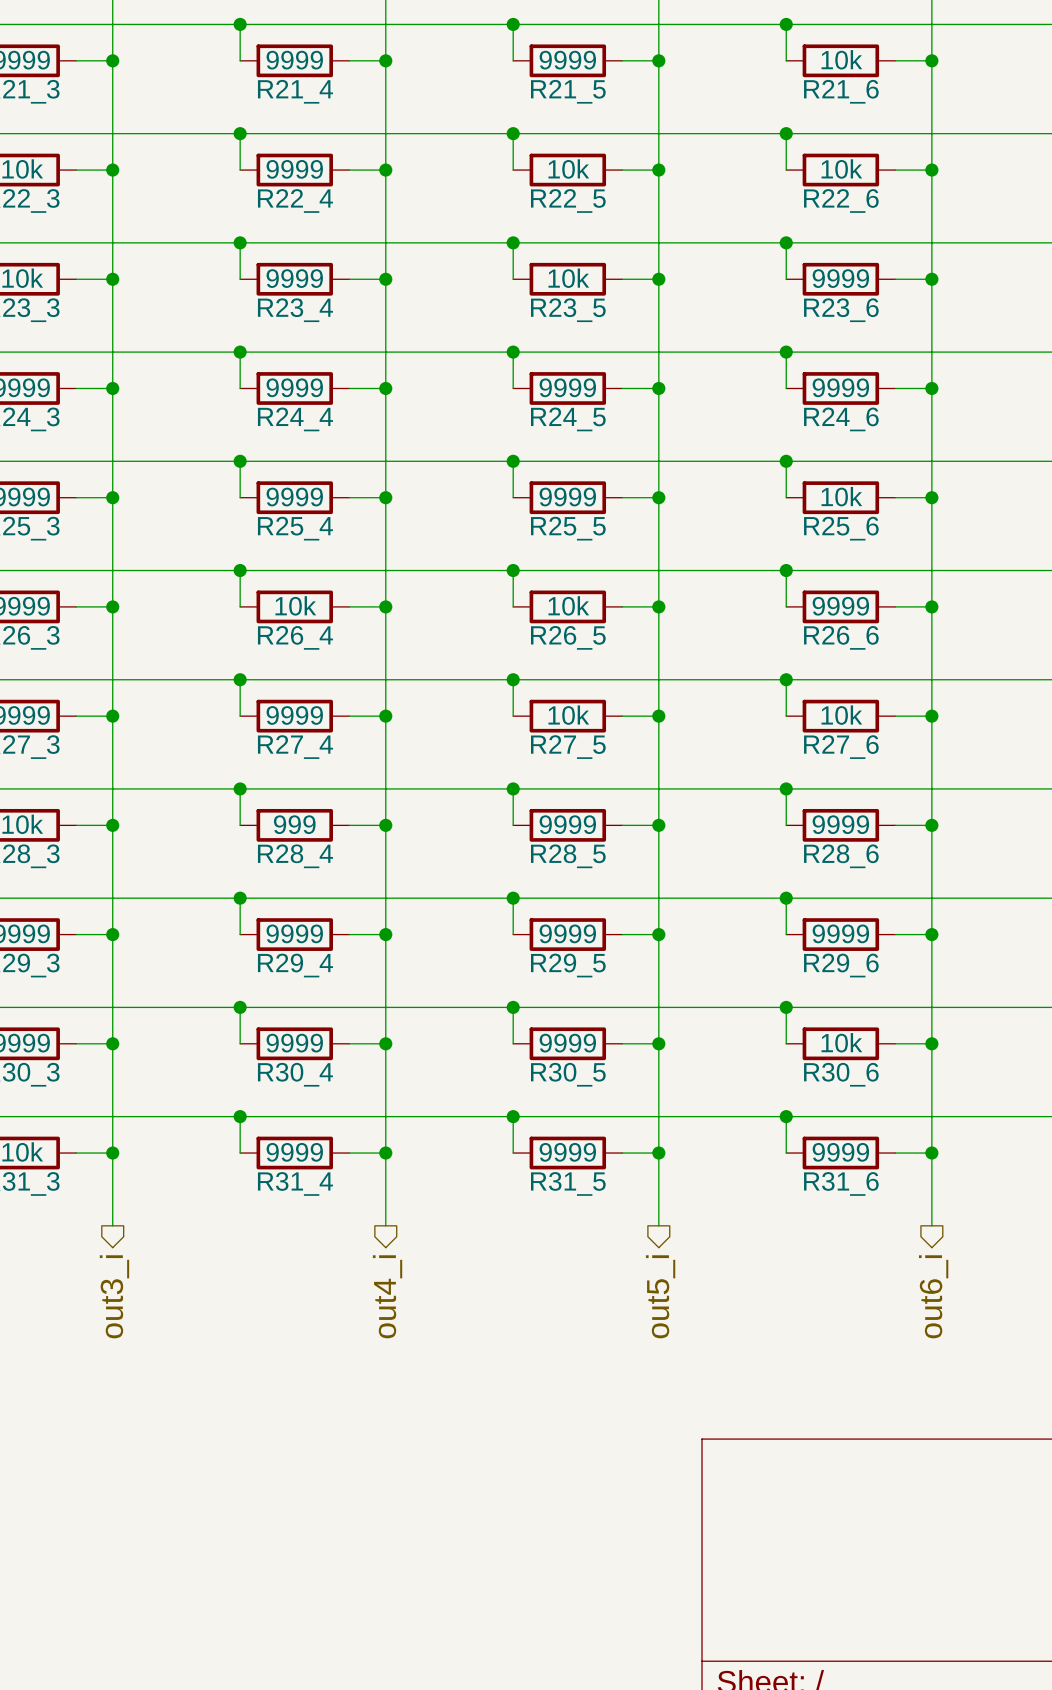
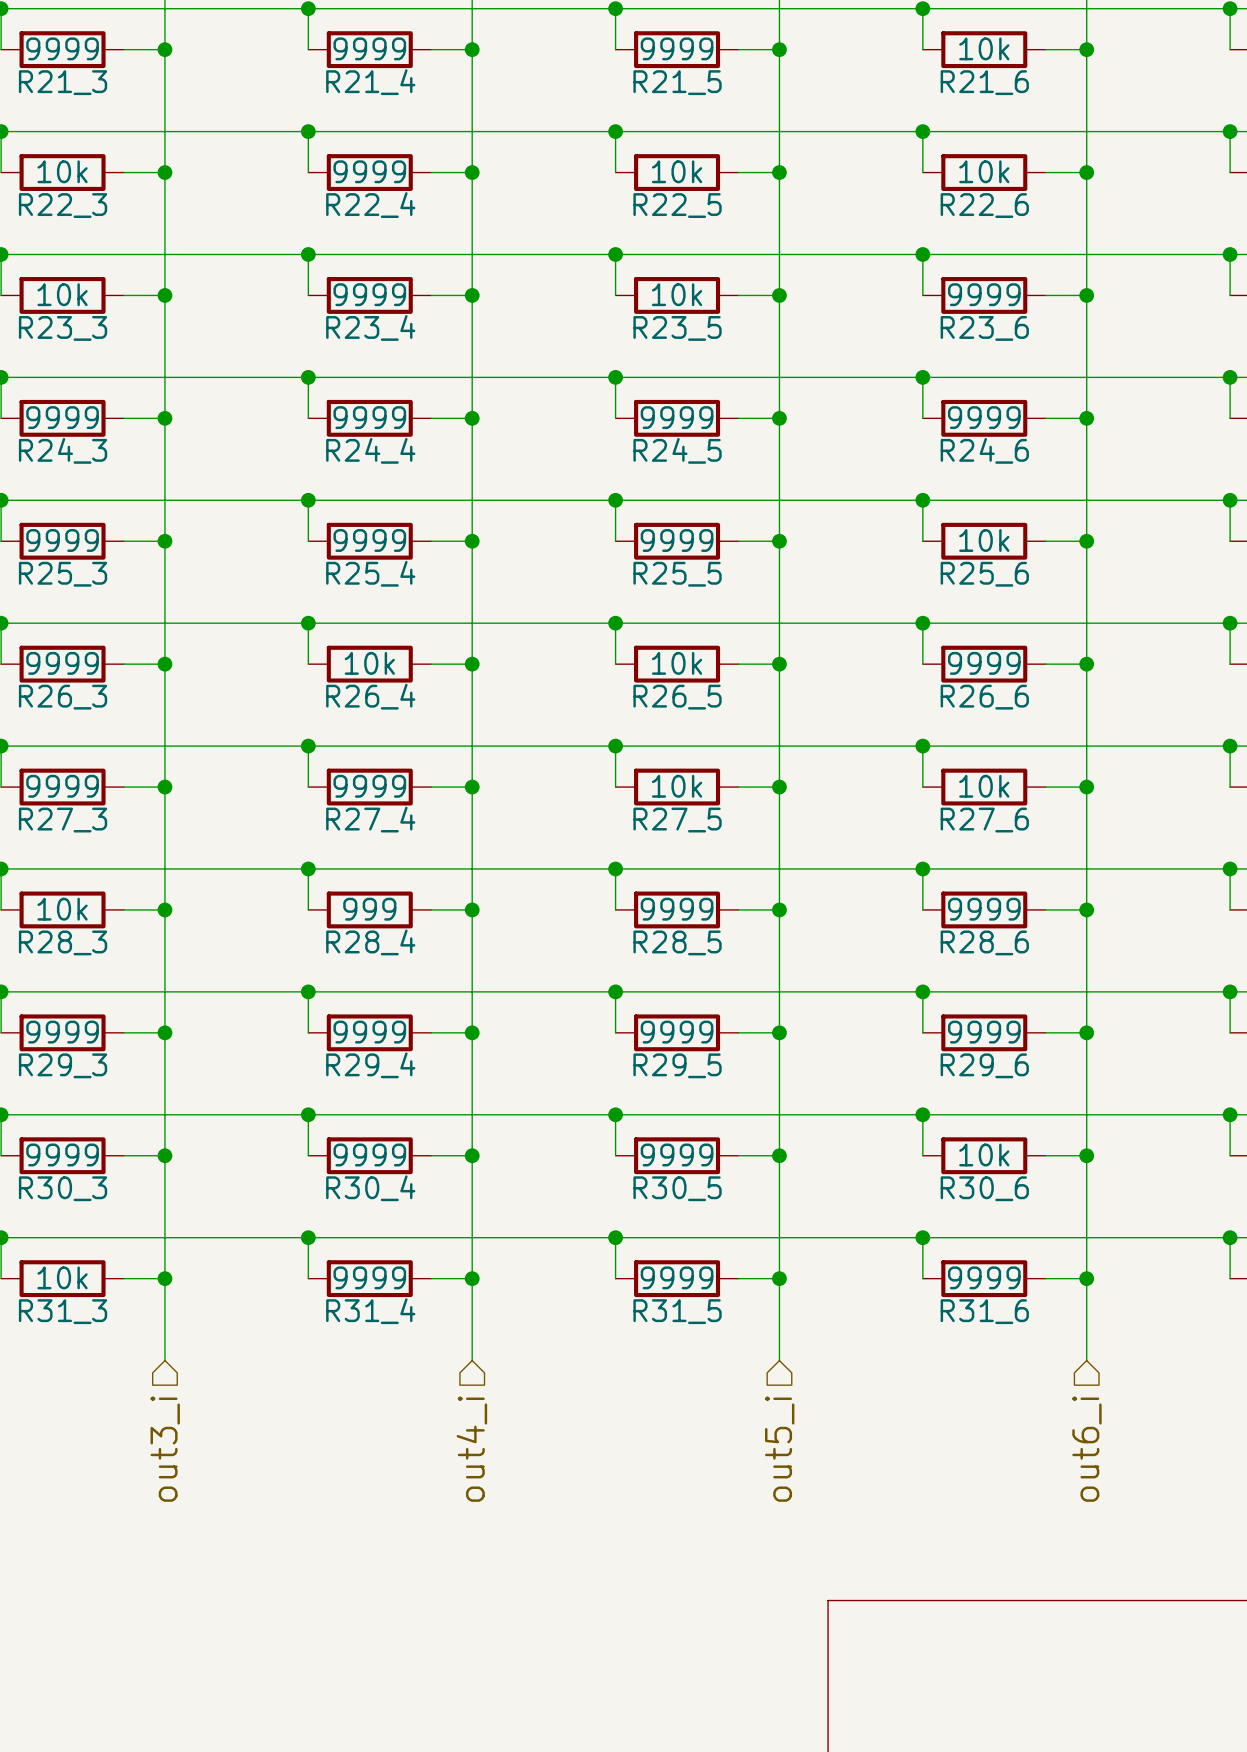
hierarchical label shape: output (114, 1296) -> input (165, 1449)
hierarchical label shape: output (387, 1296) -> input (471, 1449)
hierarchical label shape: output (660, 1296) -> input (779, 1449)
hierarchical label shape: output (933, 1296) -> input (1086, 1449)

